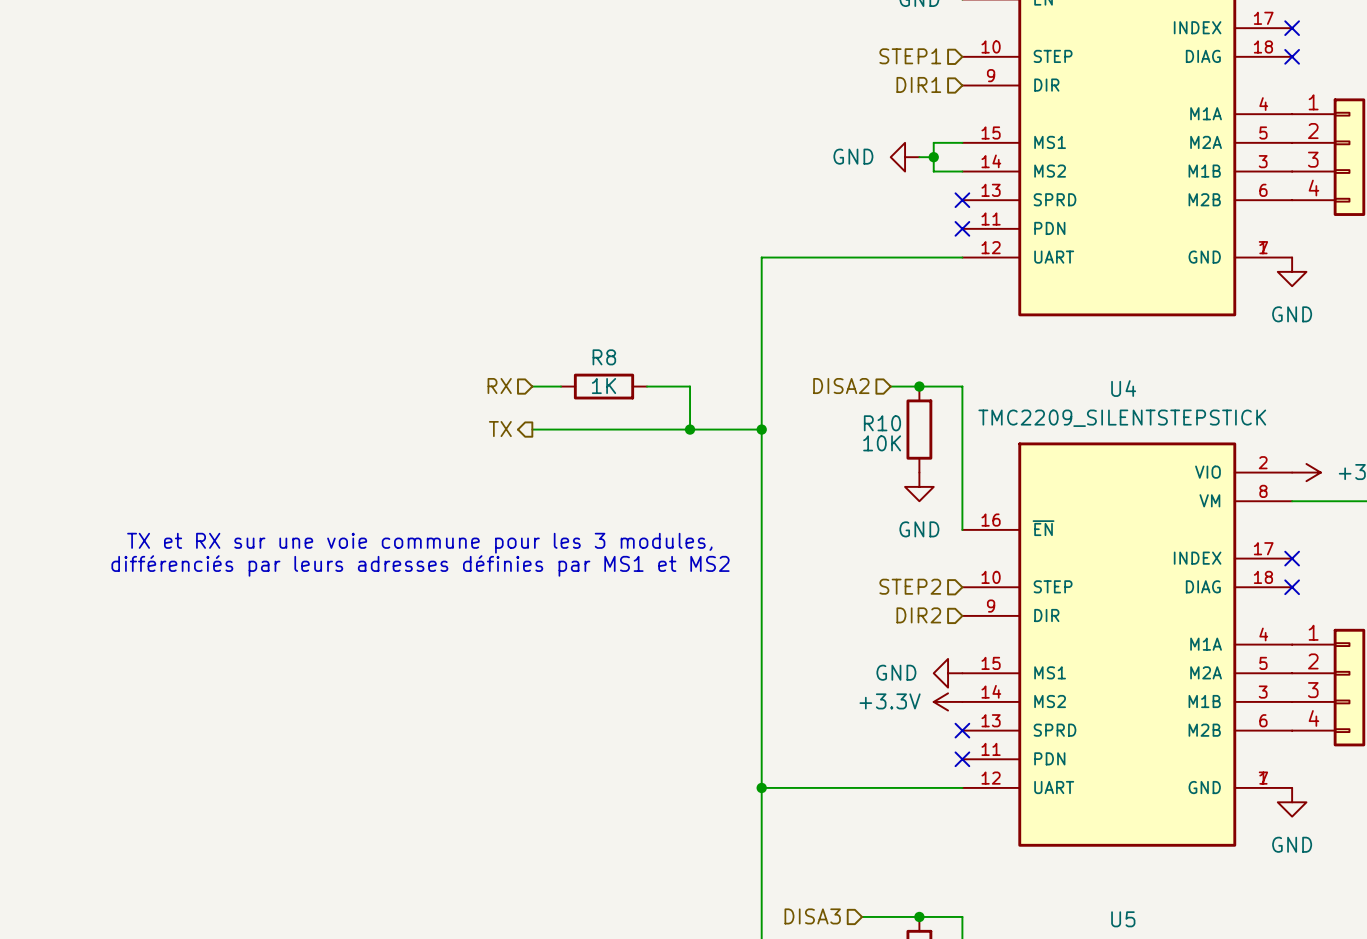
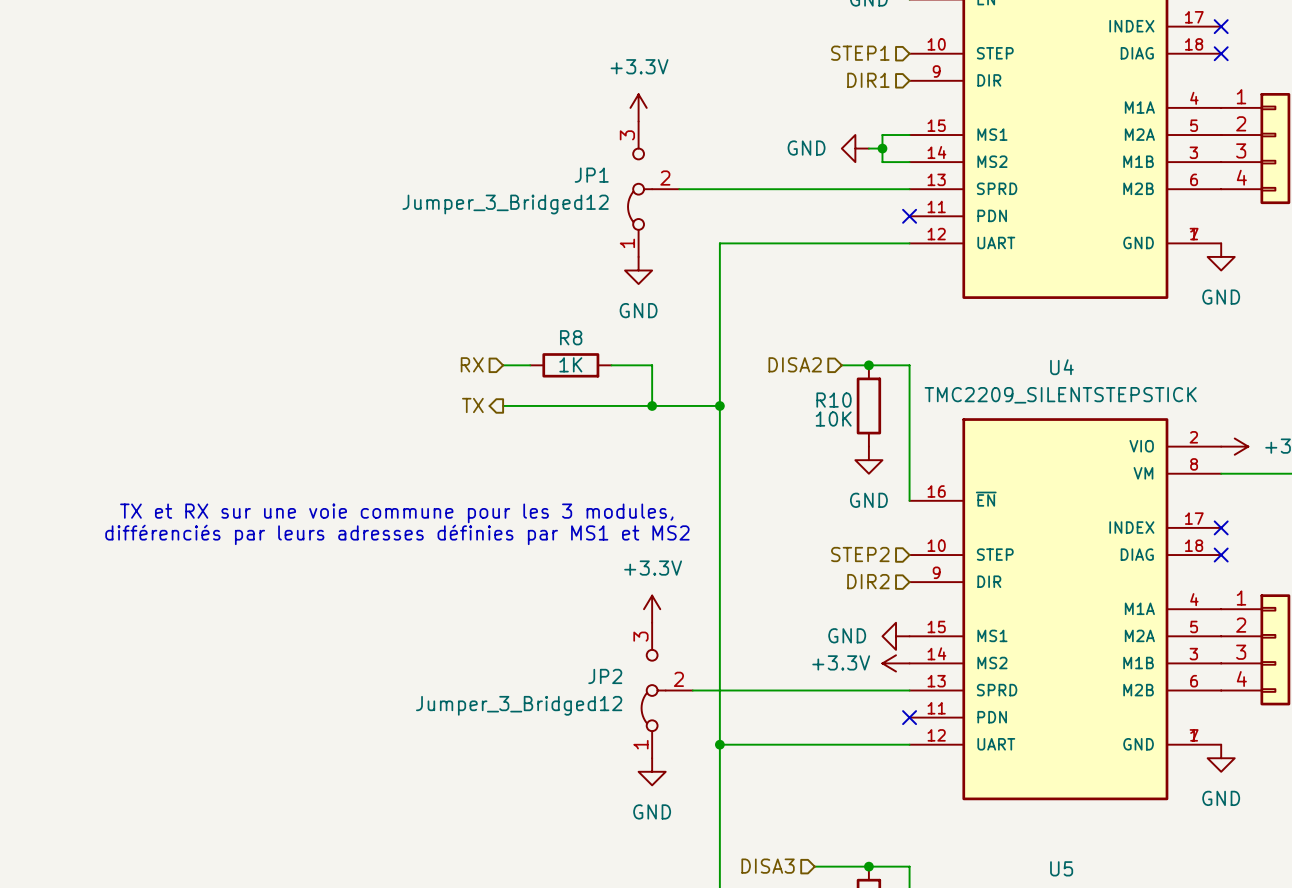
power symbol: none -> +3.3V (638, 107)
JP1: none -> Jumper_3_Bridged12 (653, 189)
wire: none -> (679, 189) (909, 189)
no-connect mark: (962, 200) -> none
power symbol: none -> GND (638, 270)
power symbol: none -> +3.3V (652, 609)
JP2: none -> Jumper_3_Bridged12 (667, 690)
wire: none -> (692, 690) (909, 690)
no-connect mark: (962, 730) -> none
power symbol: none -> GND (652, 771)

